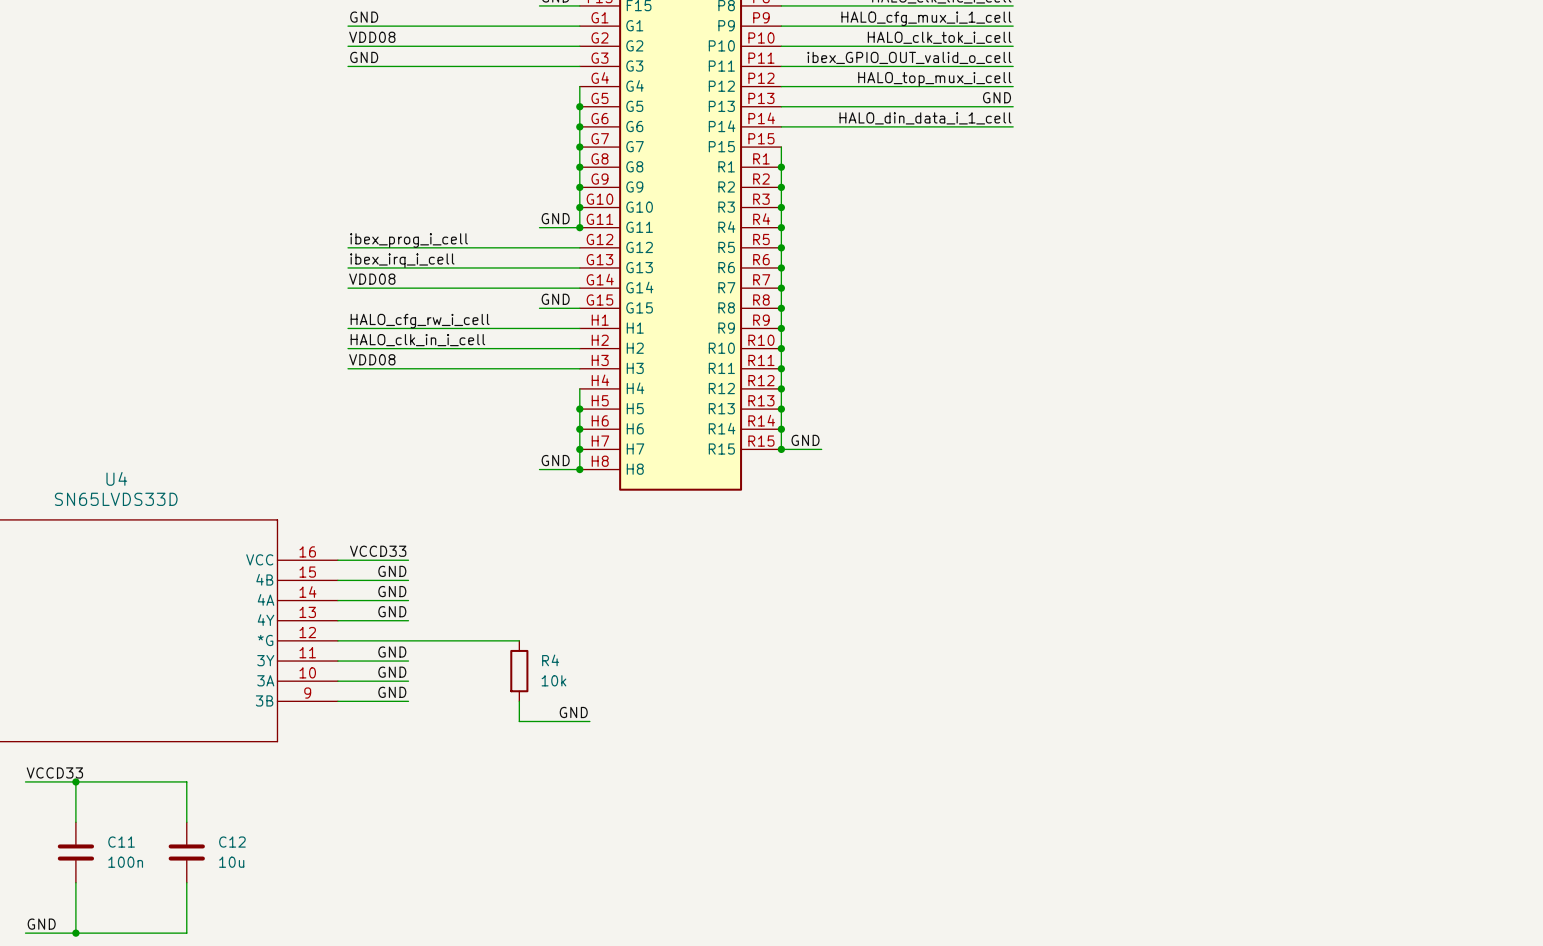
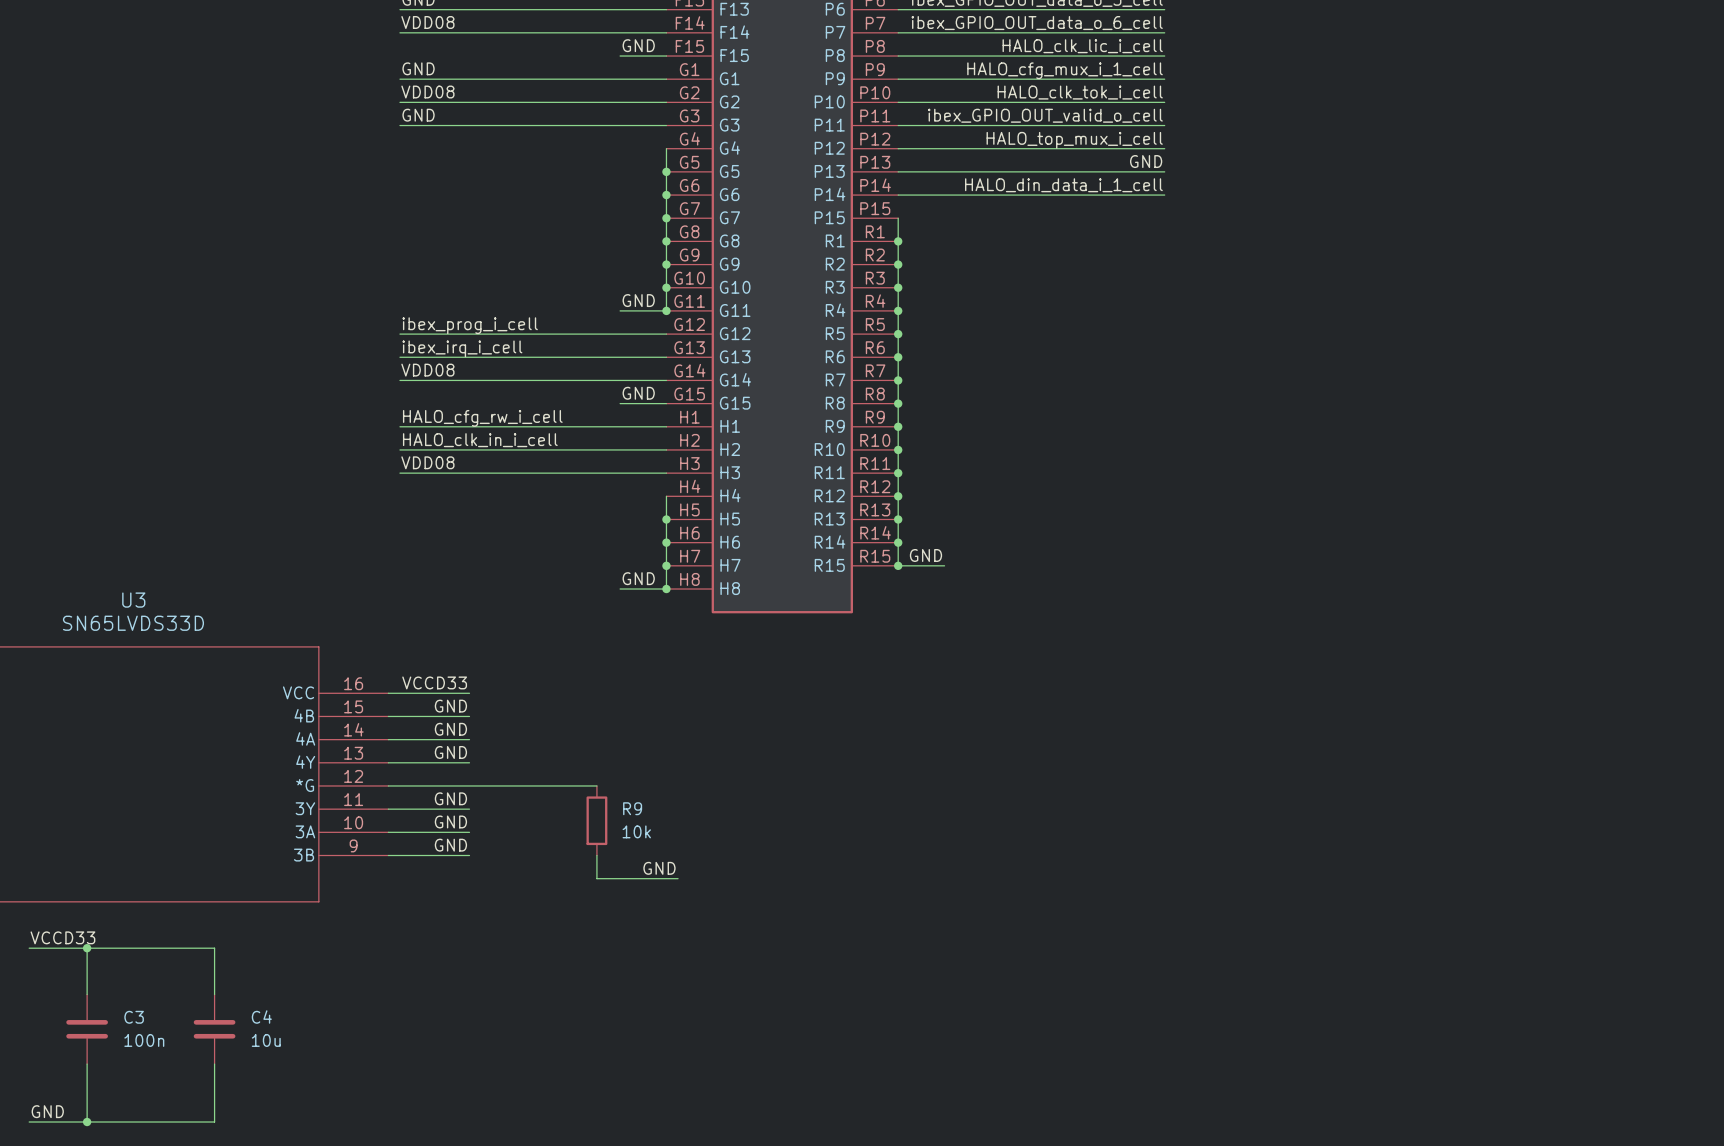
U4 name: U4 (116, 478) -> U3 (133, 600)
R4 name: R4 (550, 660) -> R9 (632, 808)
C11 name: C11 (121, 842) -> C3 (134, 1017)
C12 name: C12 (232, 842) -> C4 (261, 1017)

